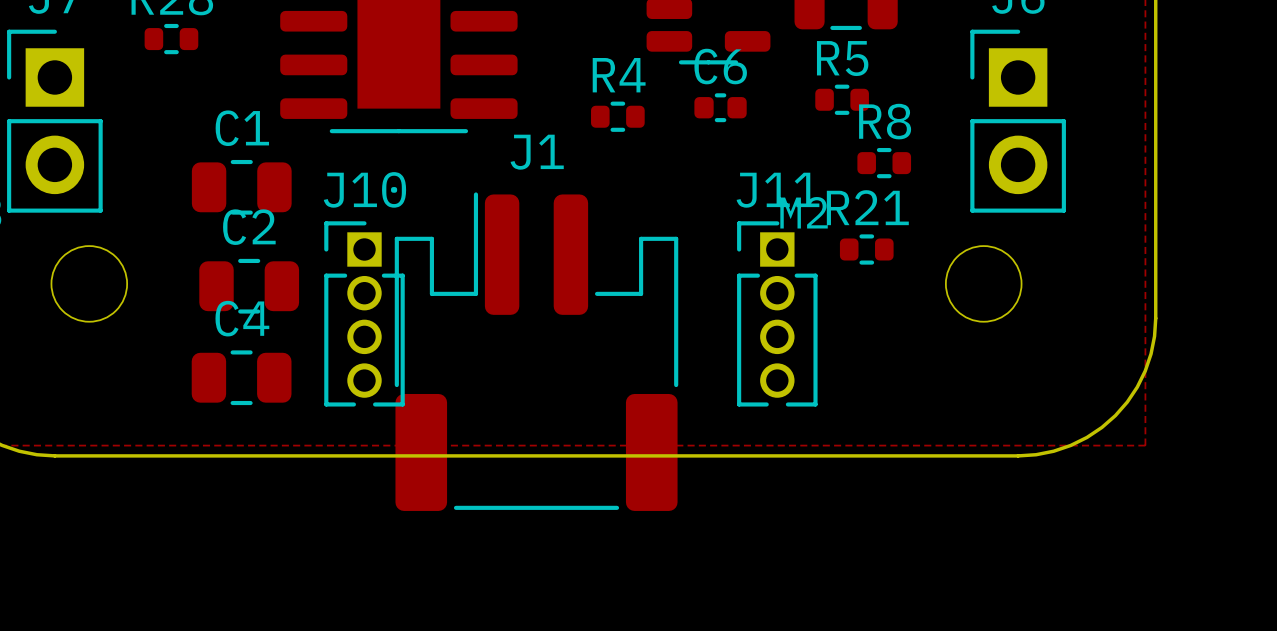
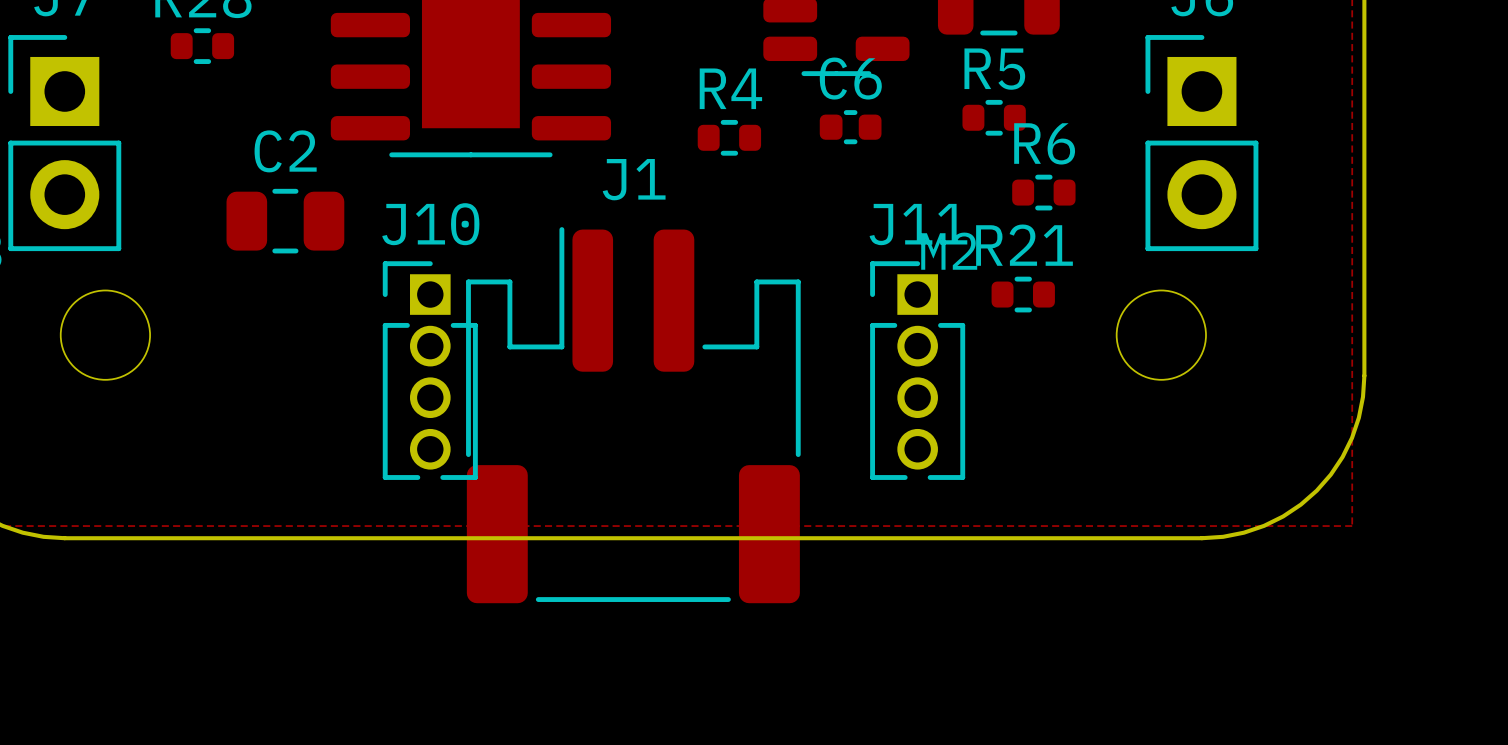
R8 name: R8 (885, 121) -> R6 (1044, 143)
C1 name: C1 (242, 128) -> C2 (285, 151)
C2: (249, 286) -> none
C4: (241, 377) -> none

